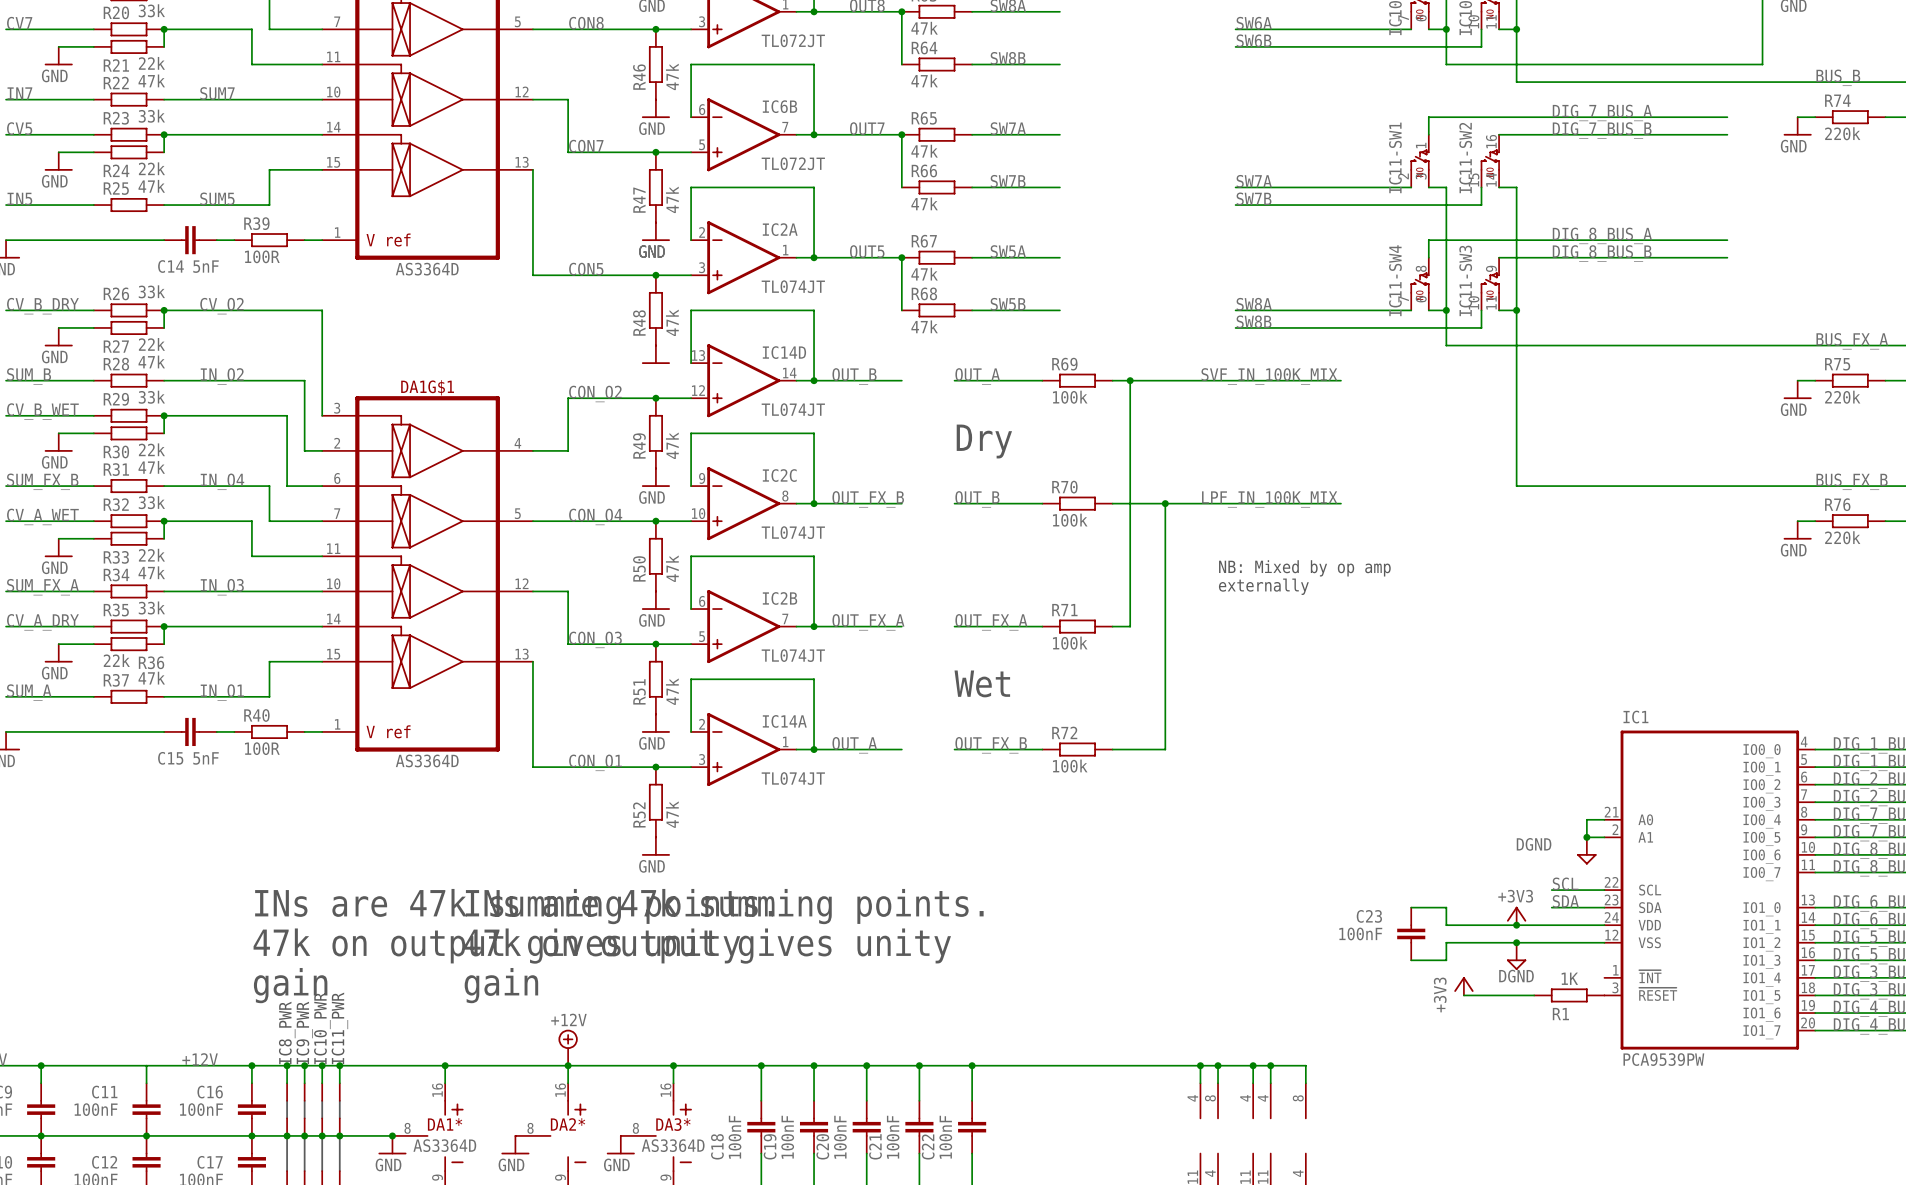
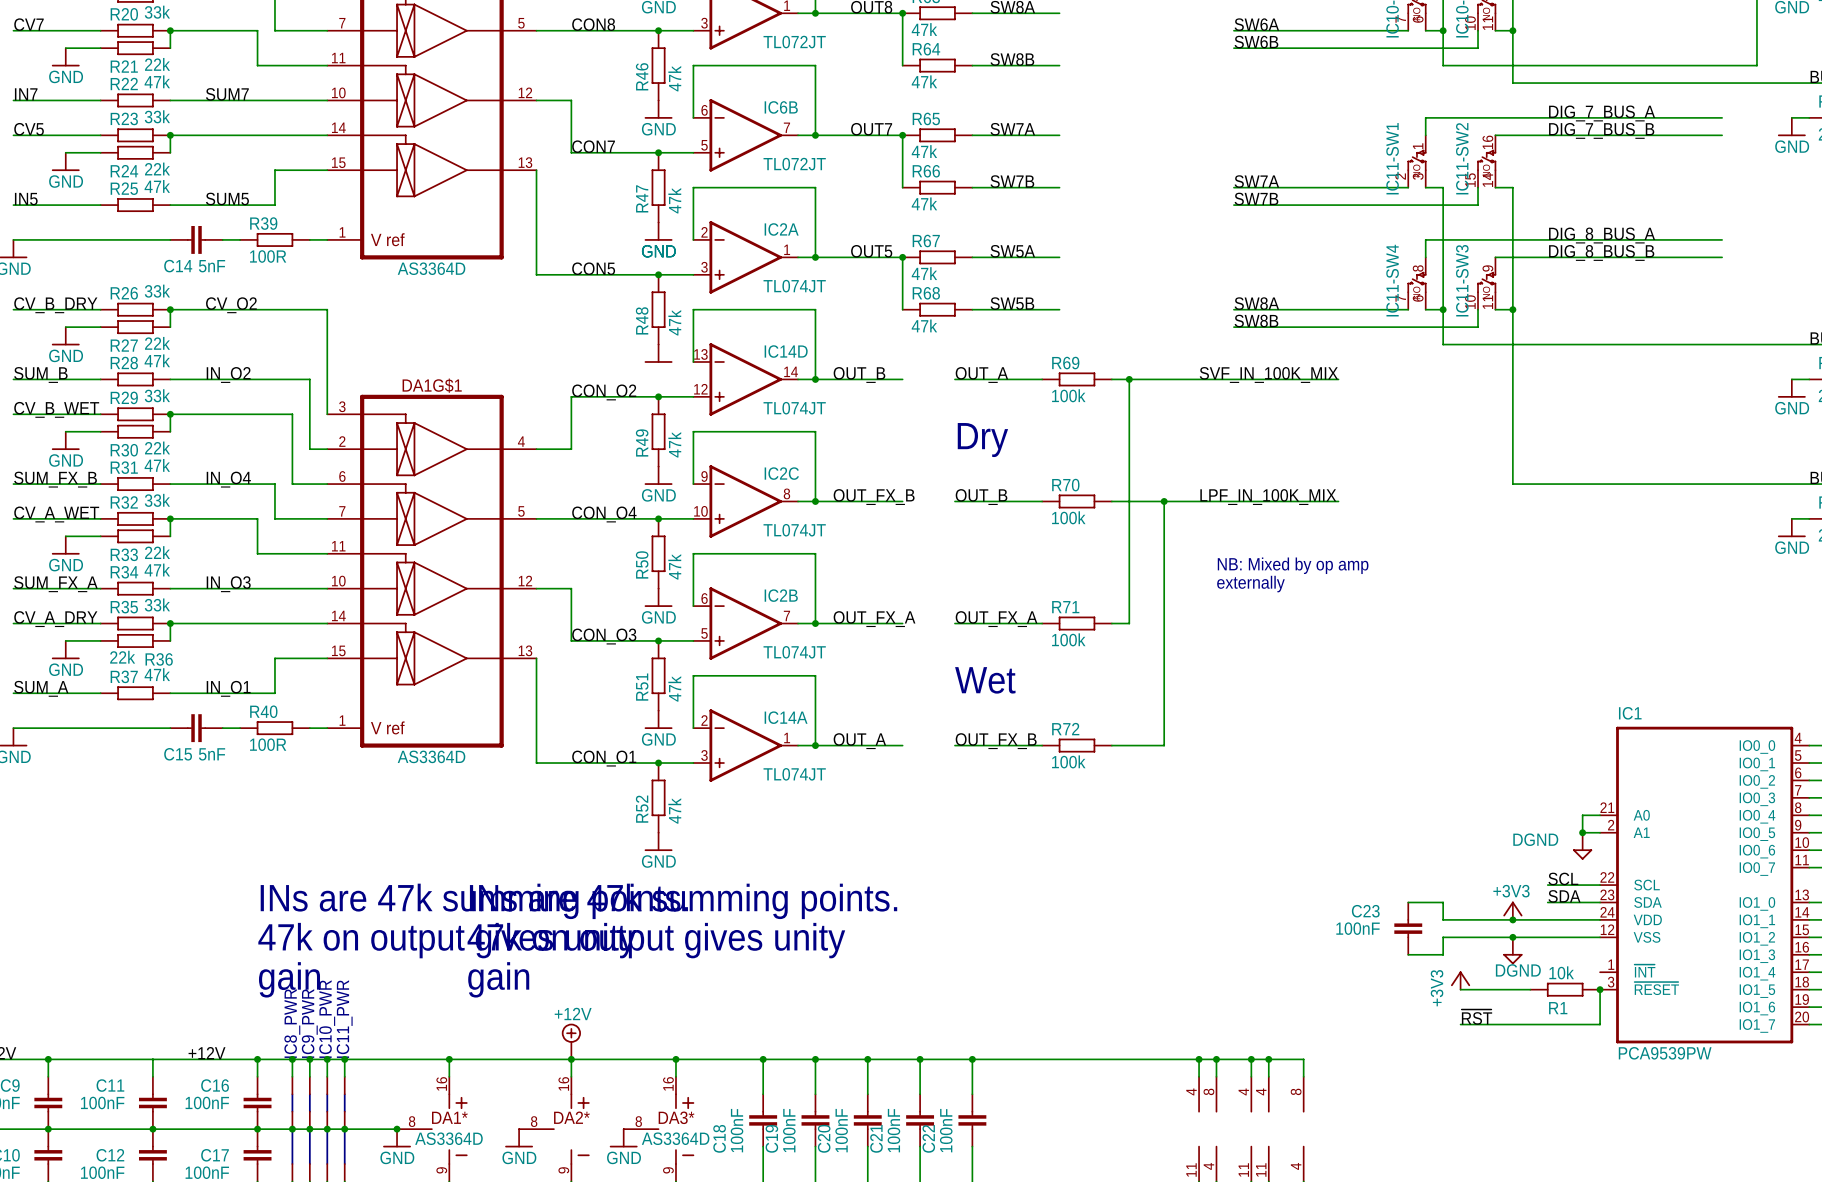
R1 value: 1K (1569, 978) -> 10k (1561, 972)
wire: none -> (1600, 989) (1600, 1024) (1460, 1024)
junction: none -> (1600, 989)
label: none -> ~{RST} (1476, 1017)

